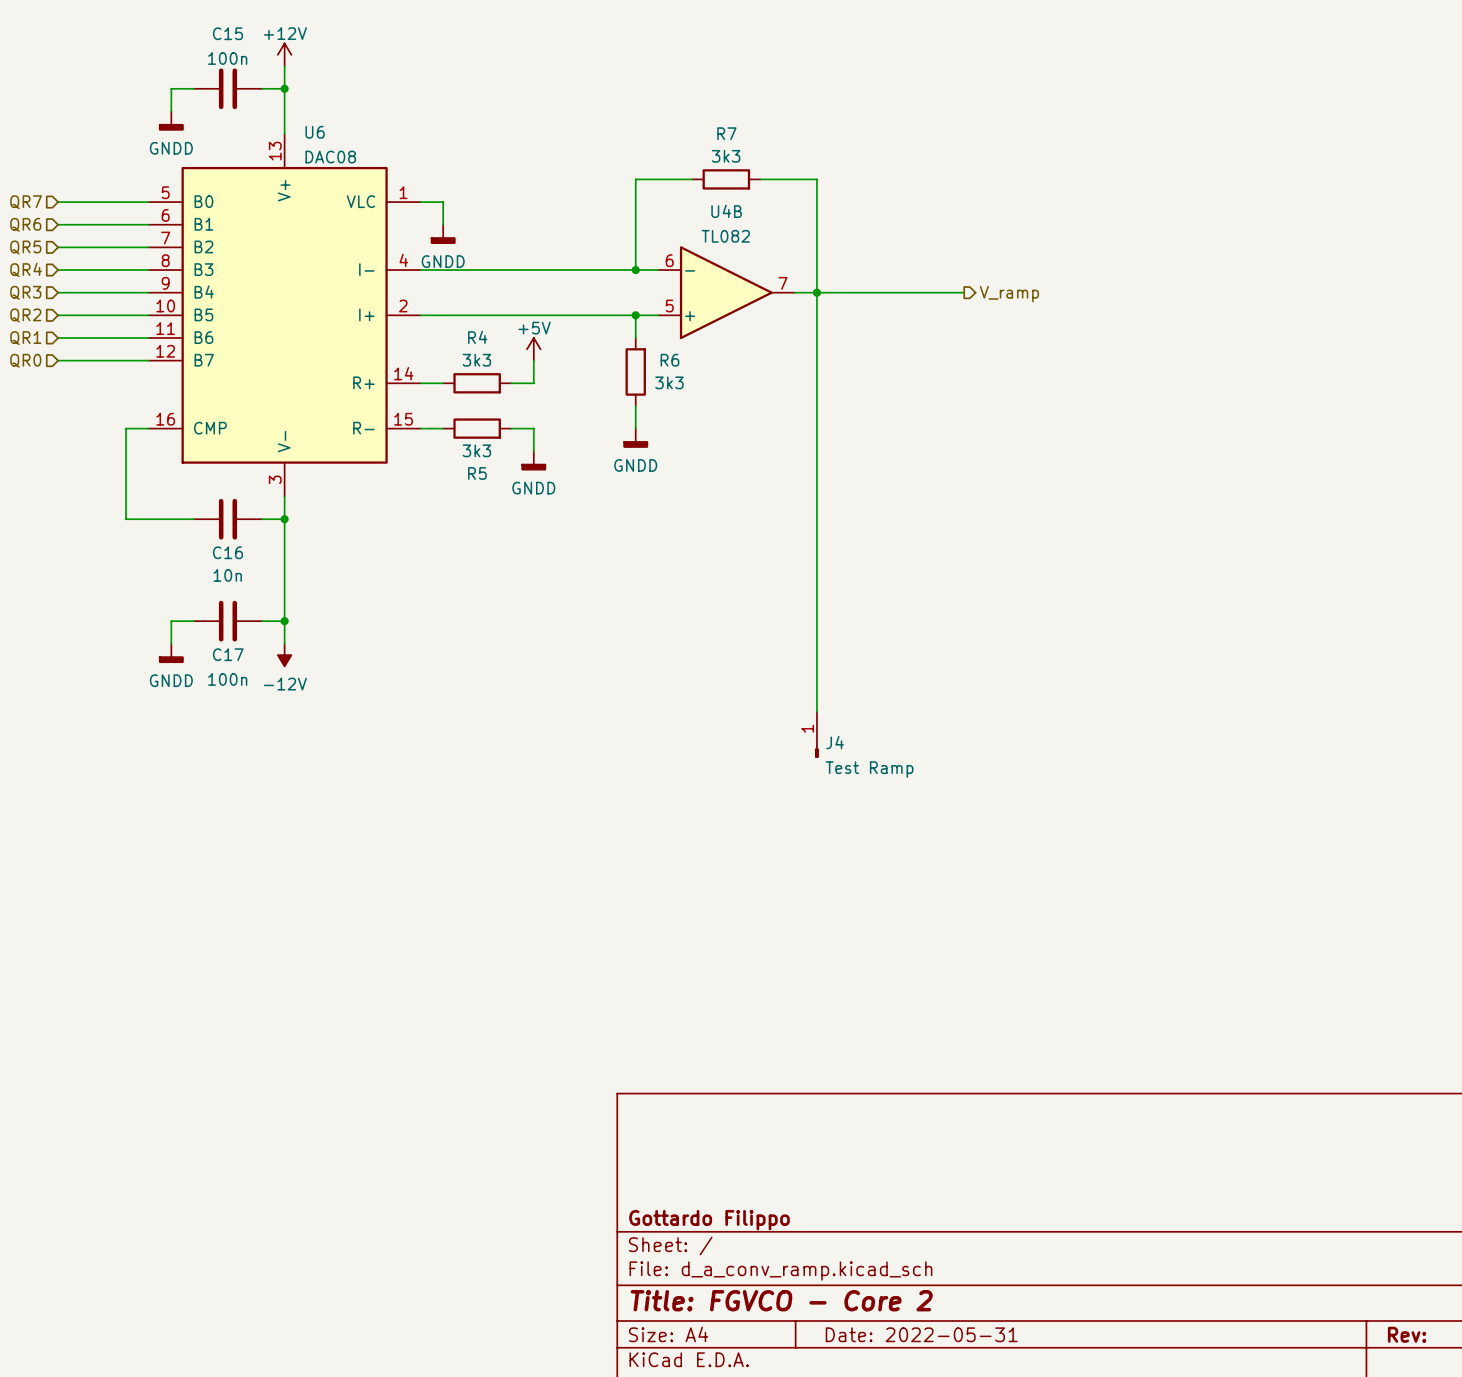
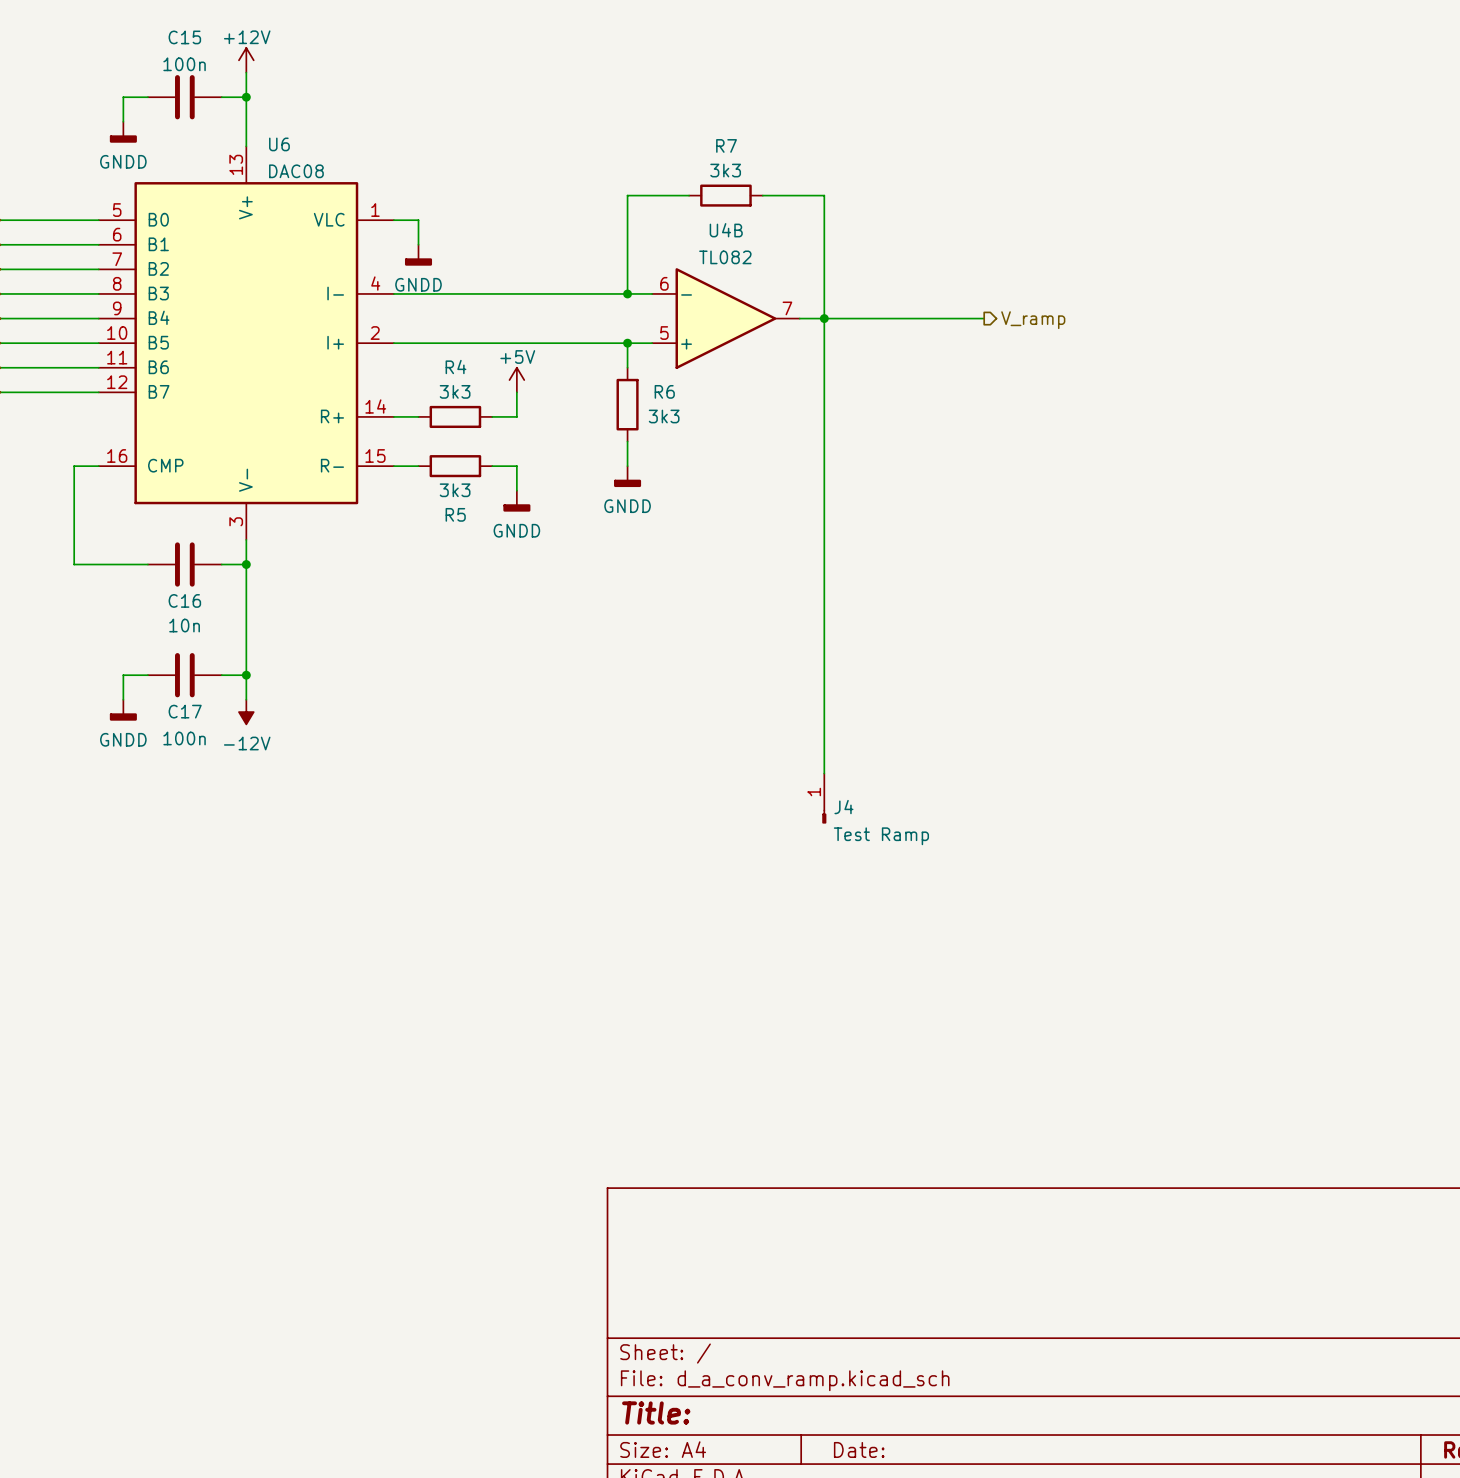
title block: Gottardo Filippo (709, 1220) -> none
title block: Title: FGVCO - Core 2 (781, 1300) -> Title: (656, 1412)
title block: Date: 2022-05-31 (921, 1334) -> Date: (859, 1449)

